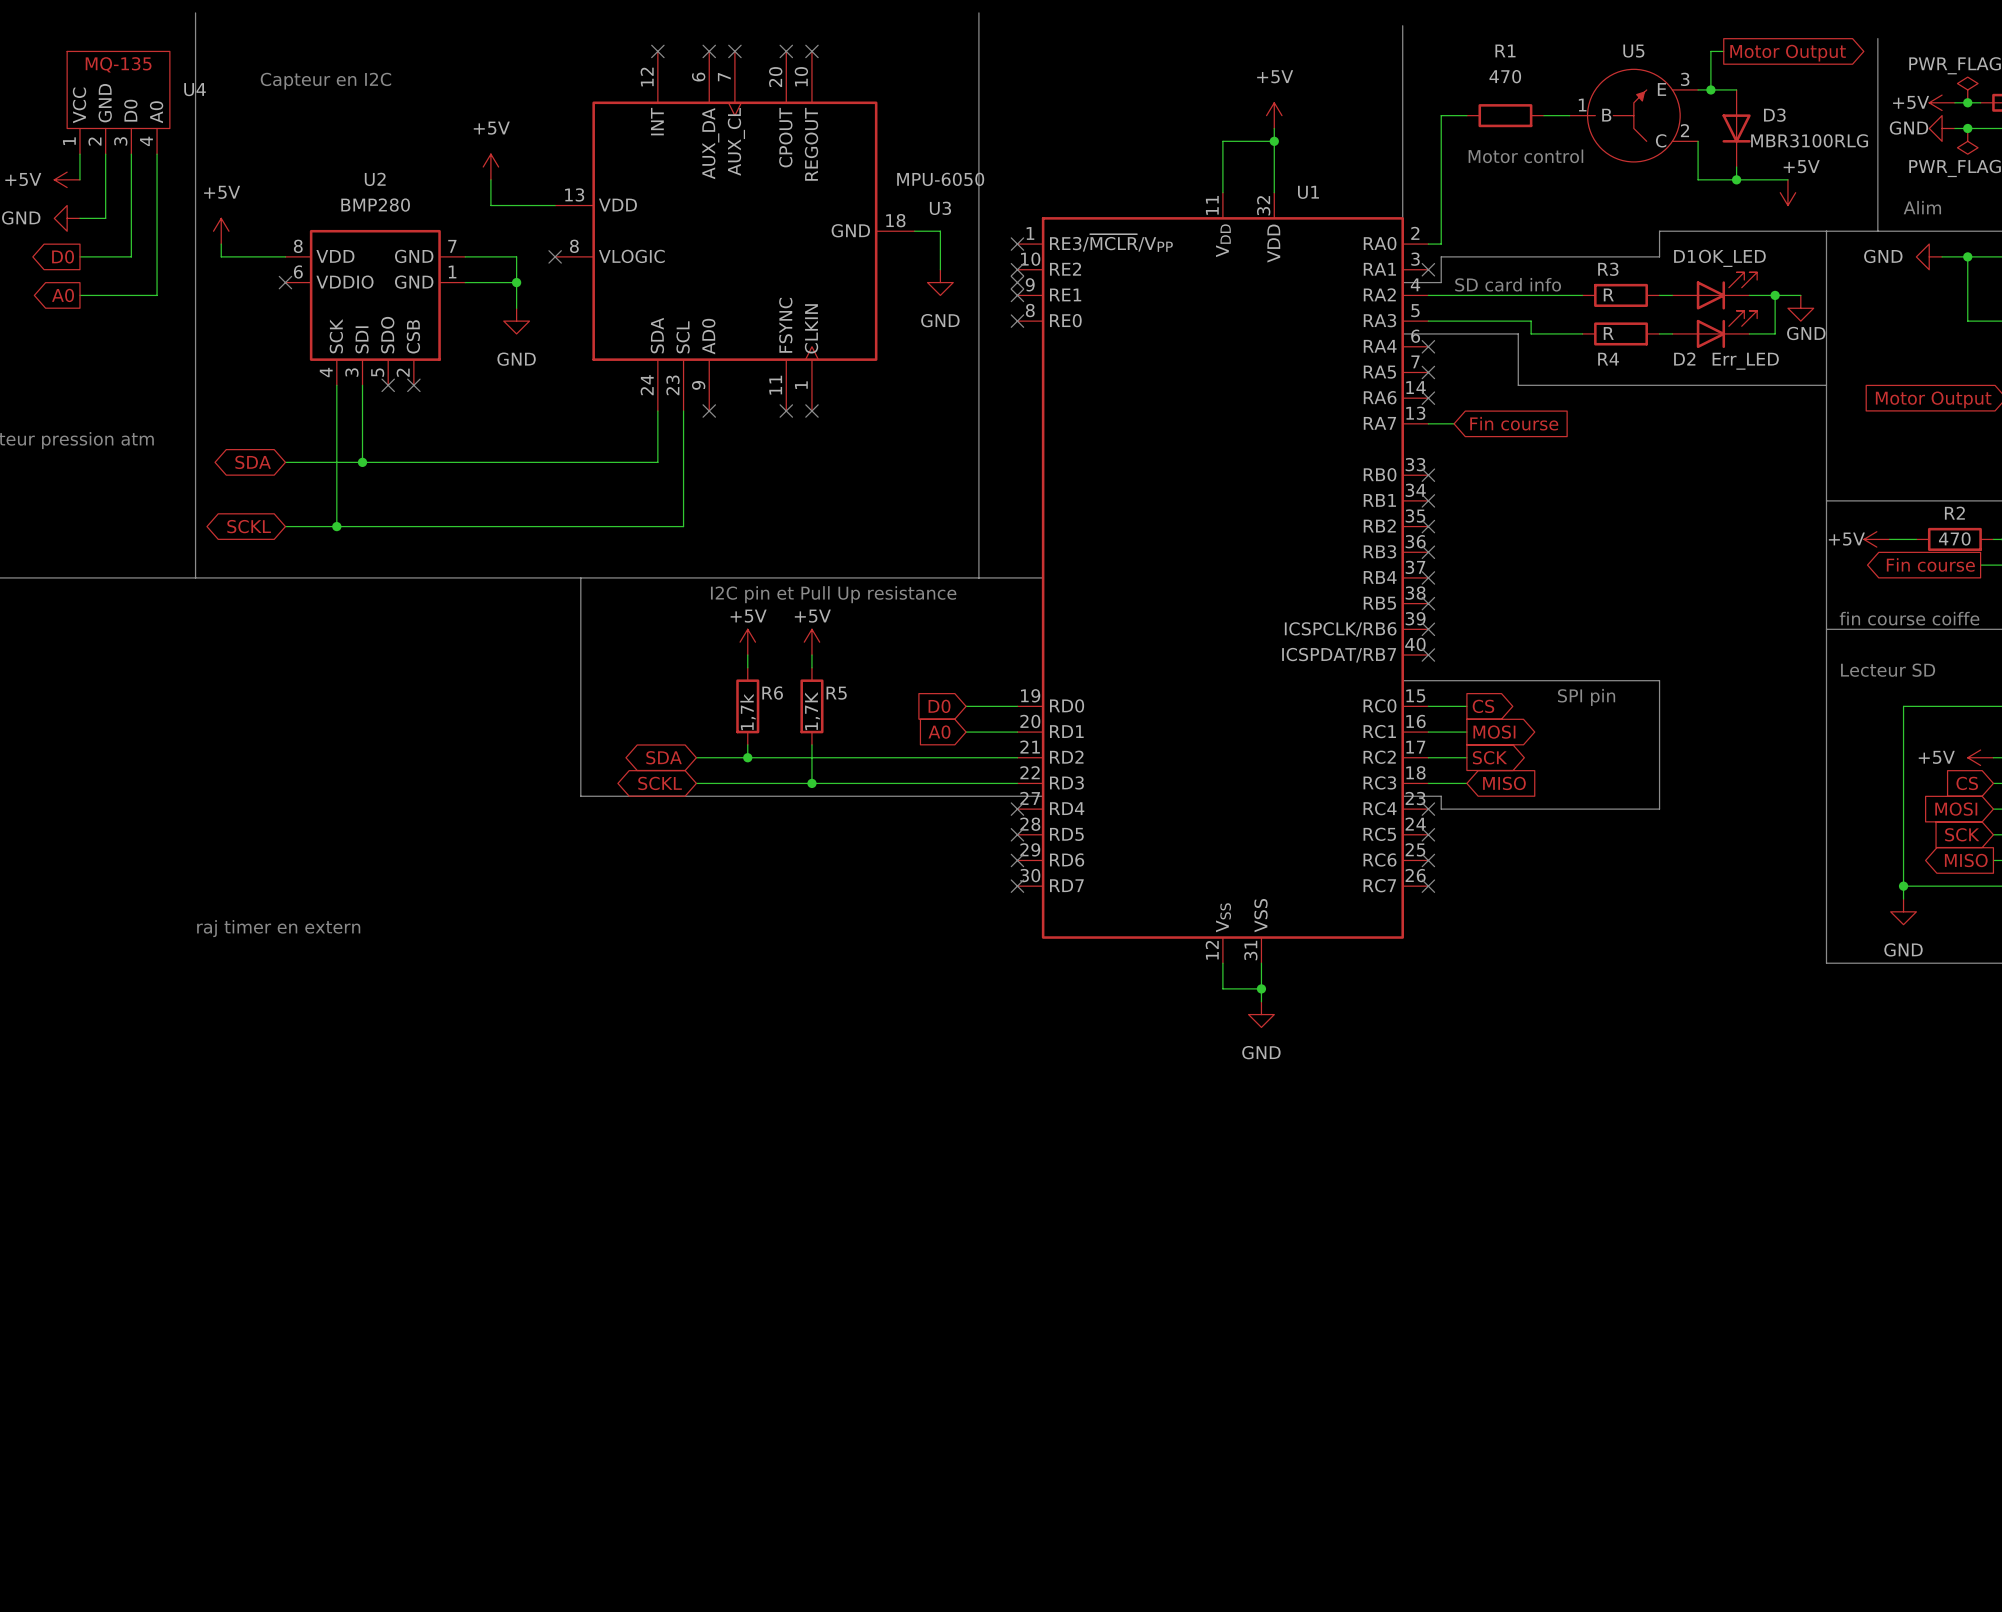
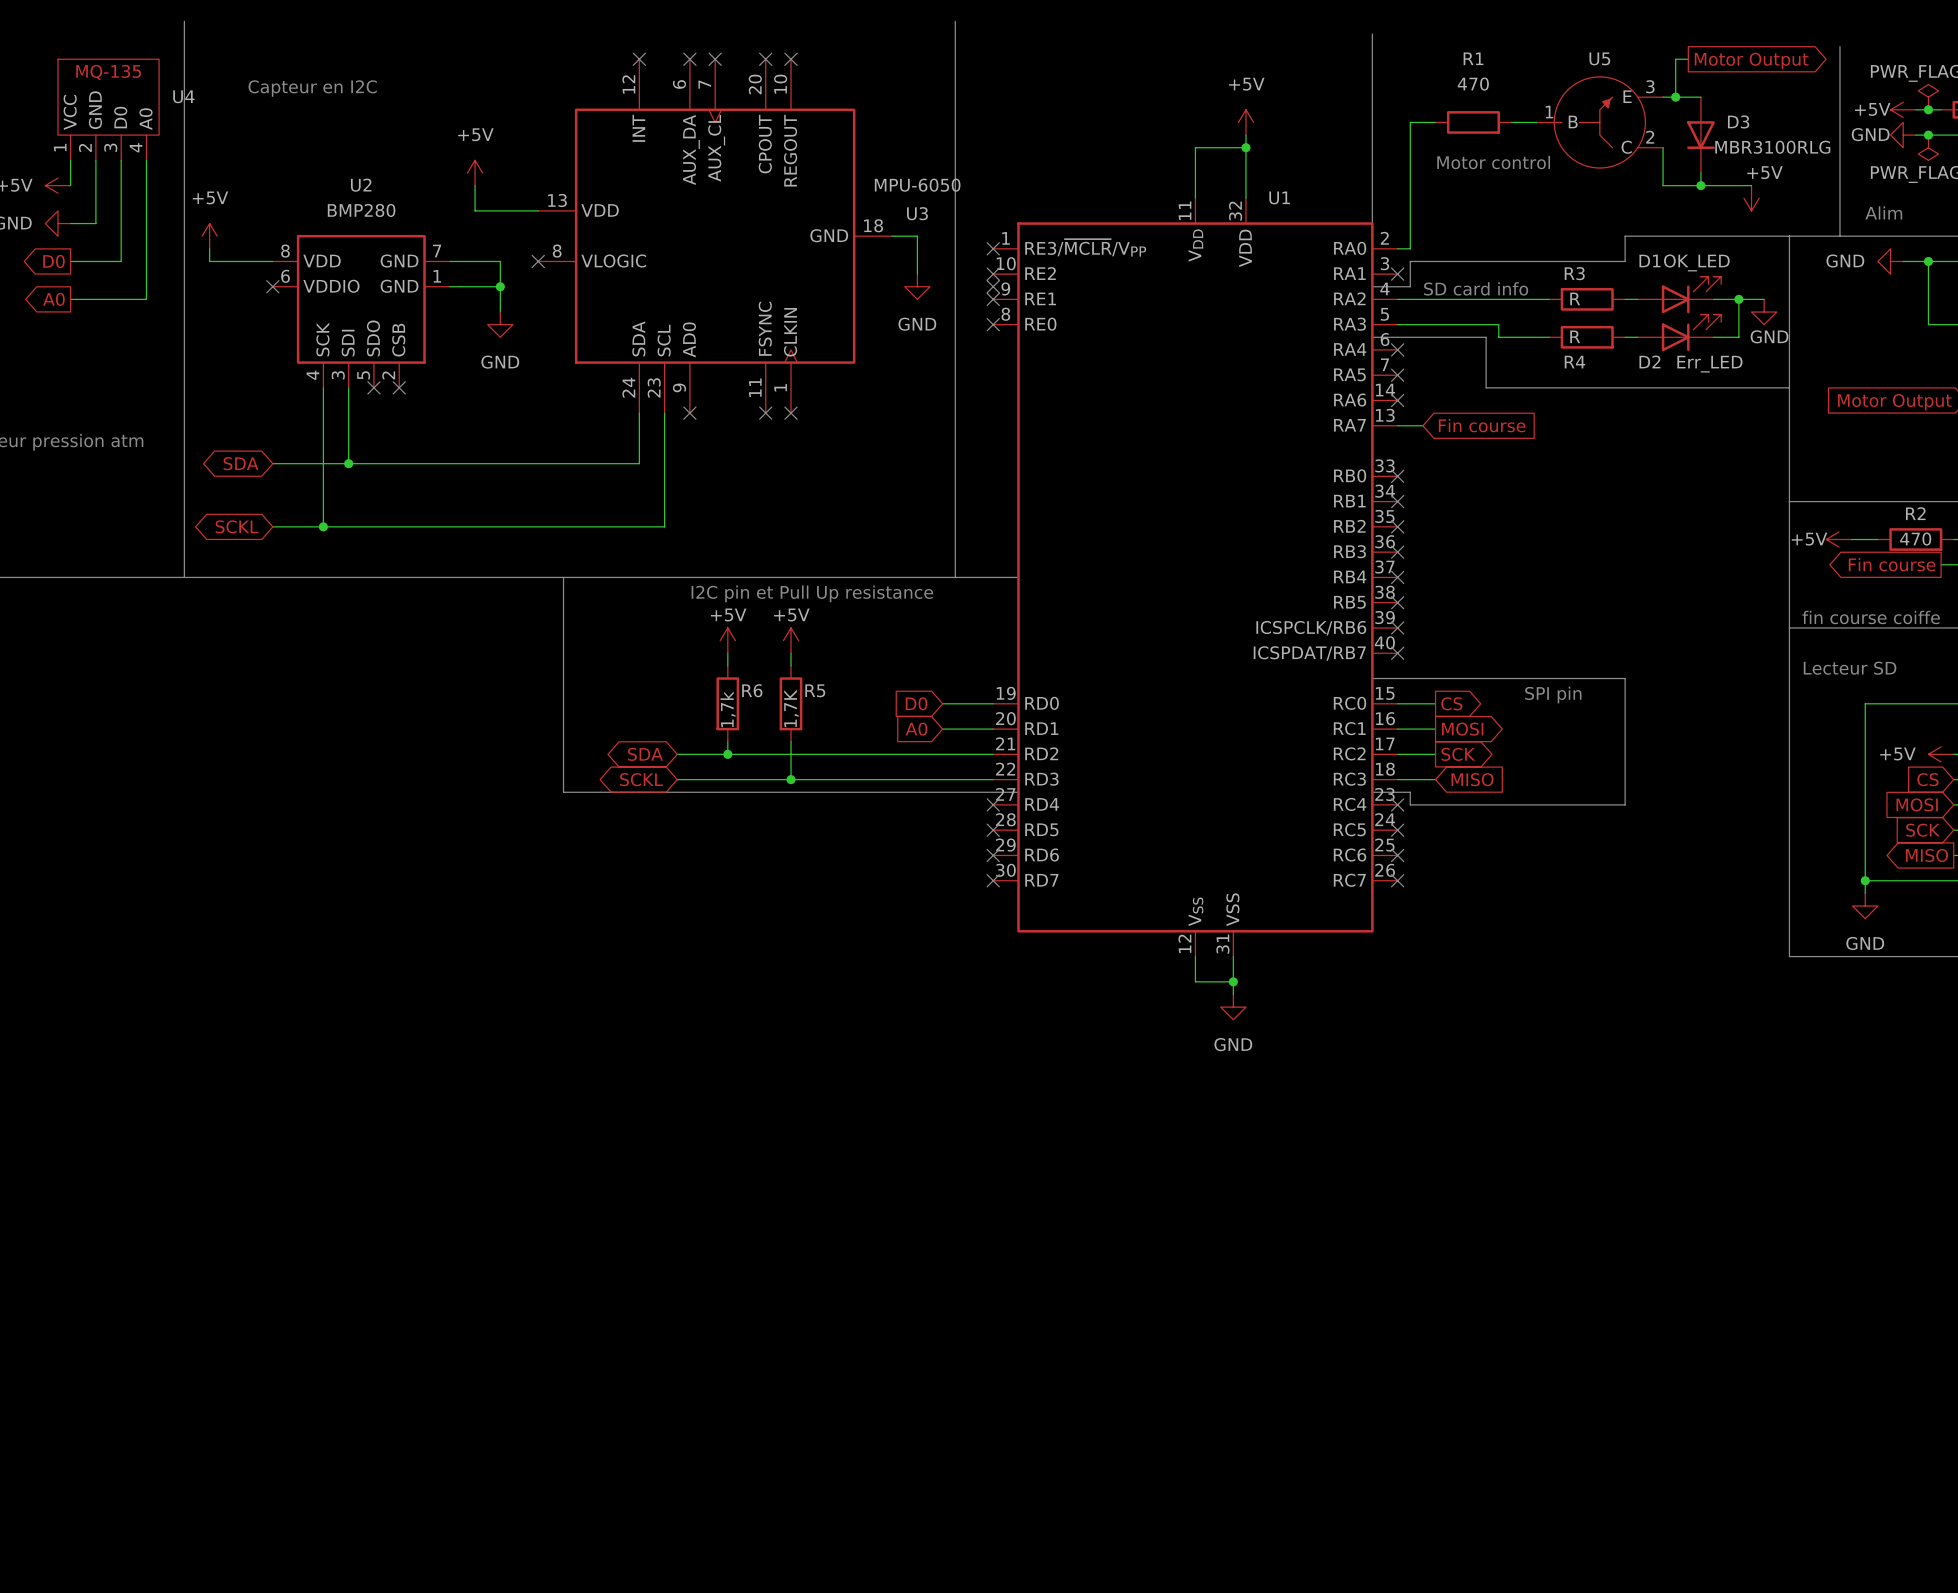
text: raj timer en extern (278, 928) -> none

